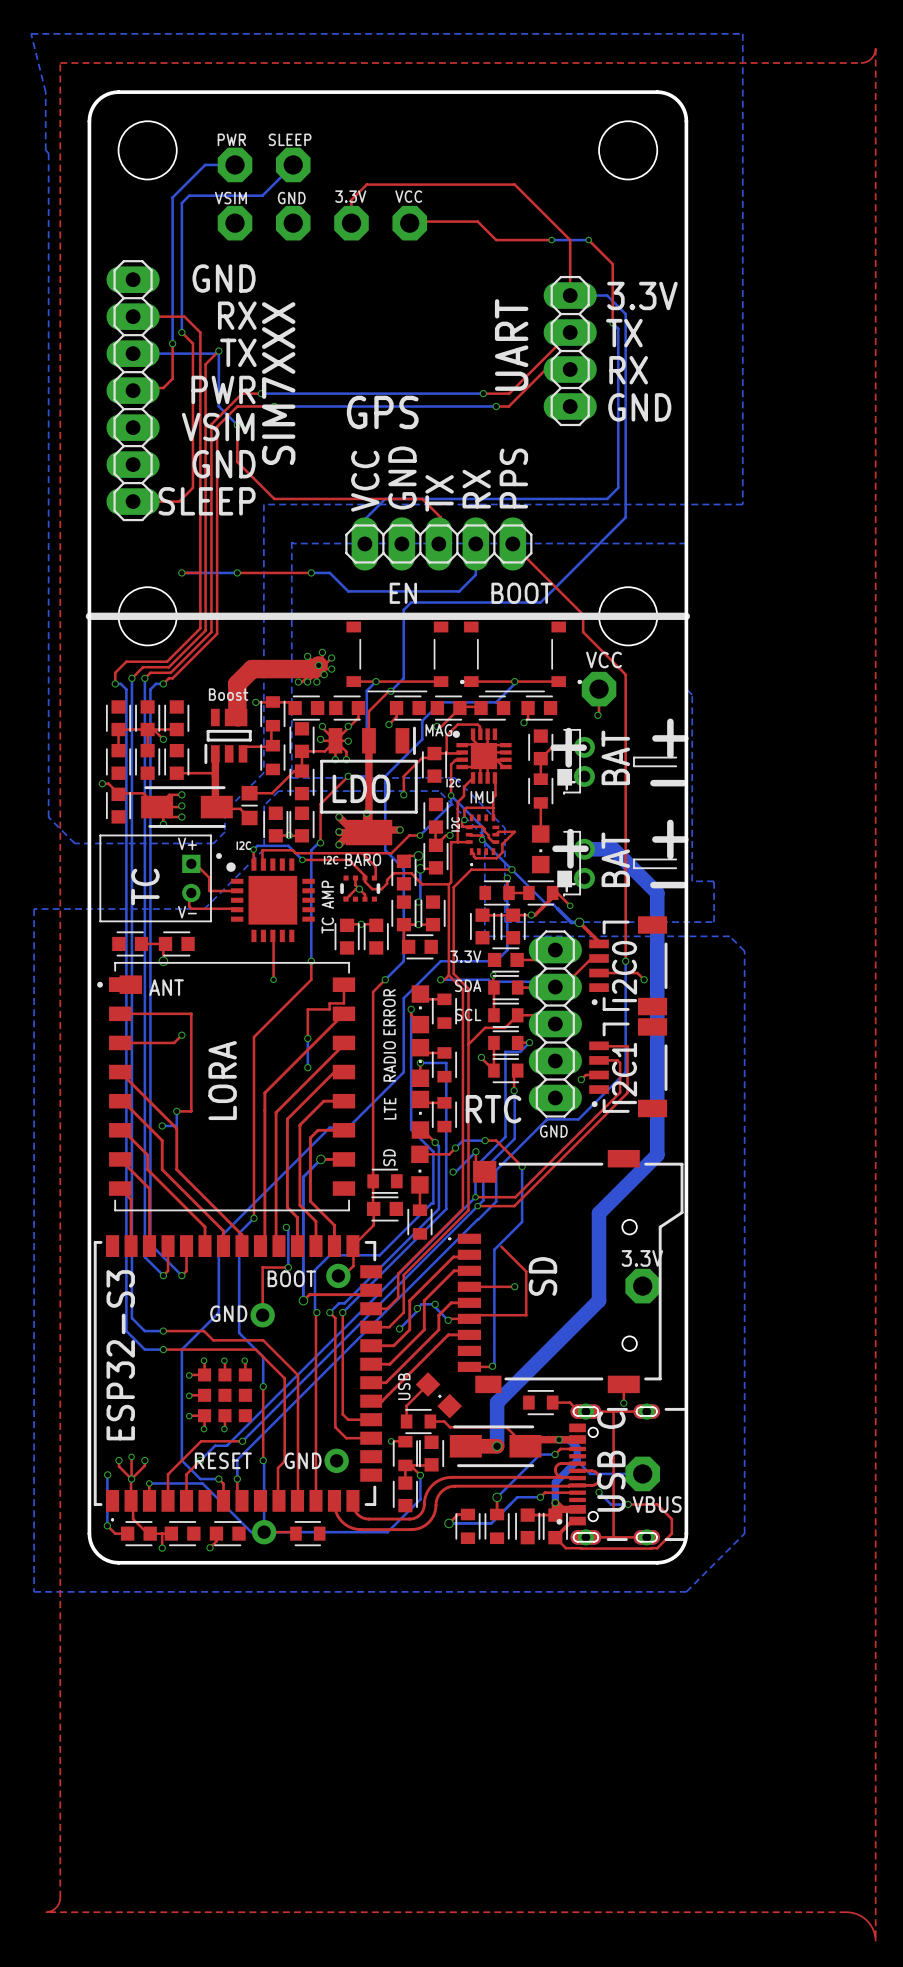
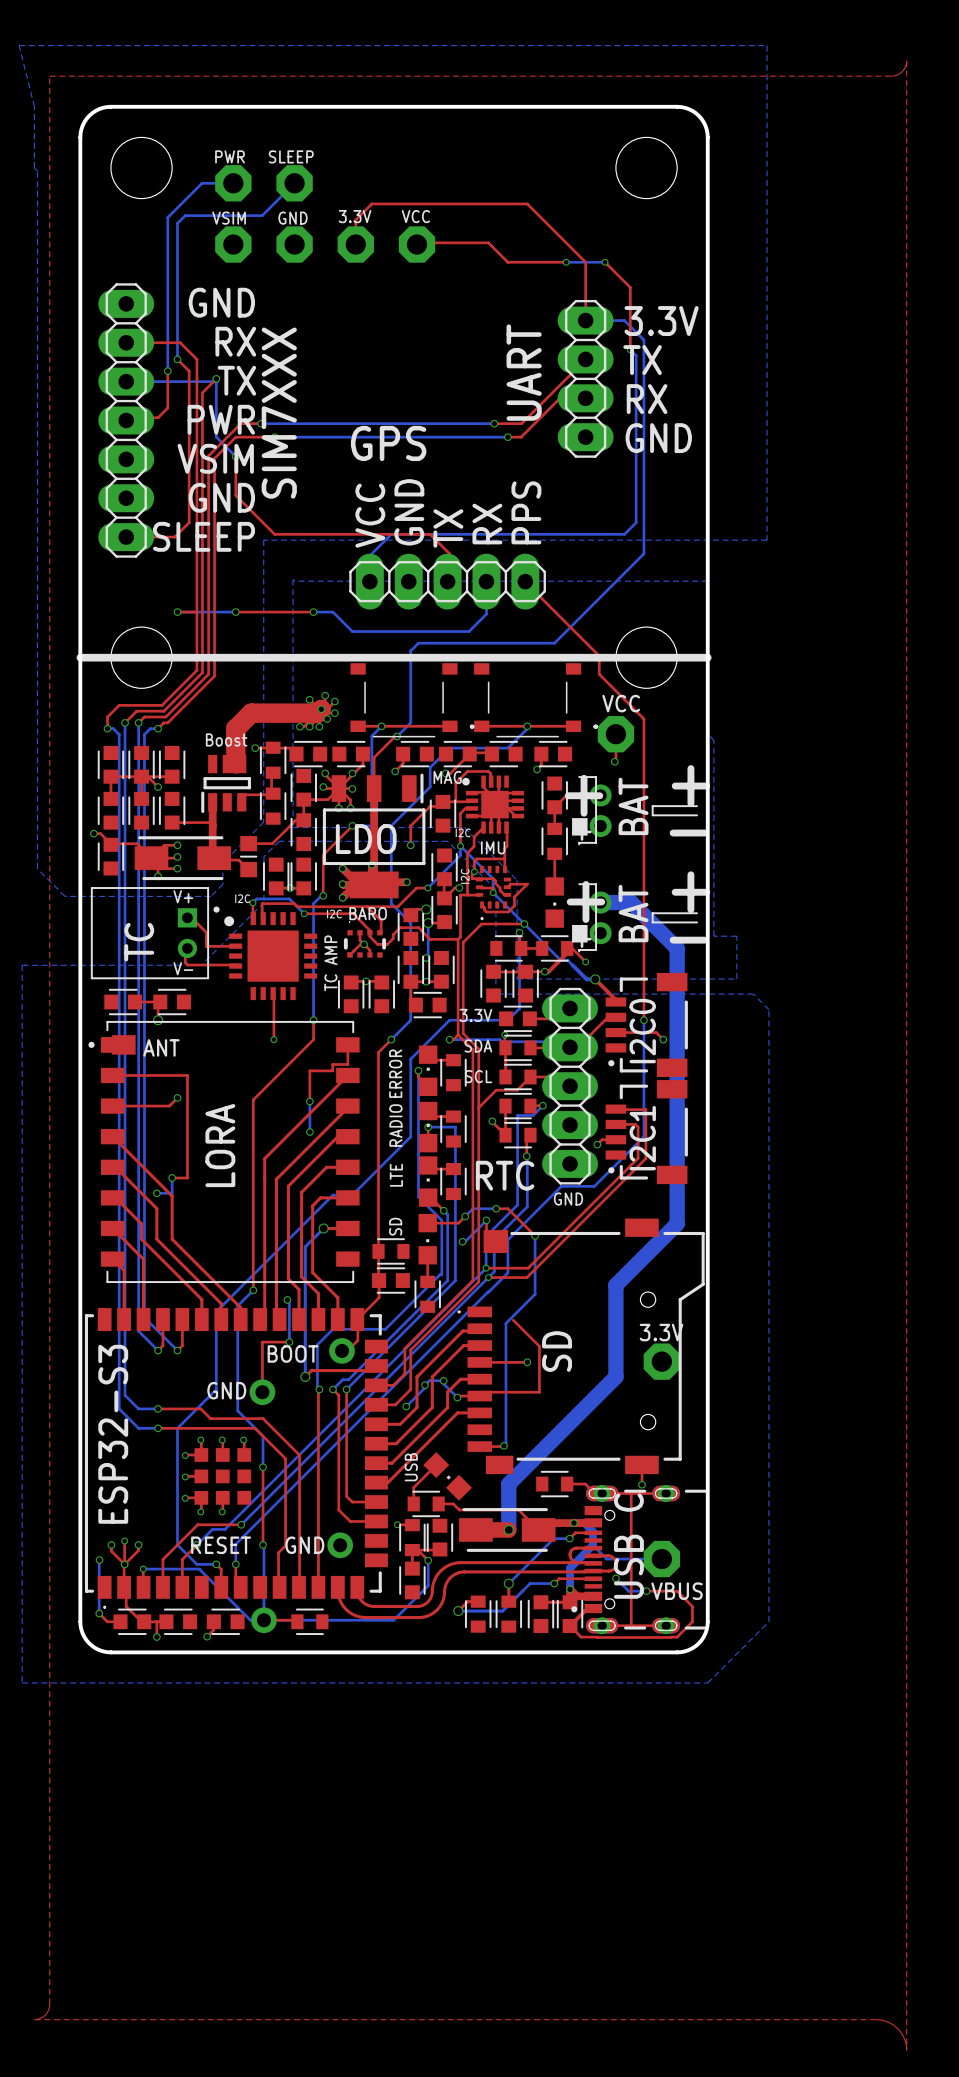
text: EN (403, 593) -> none
text: BOOT (522, 593) -> none

